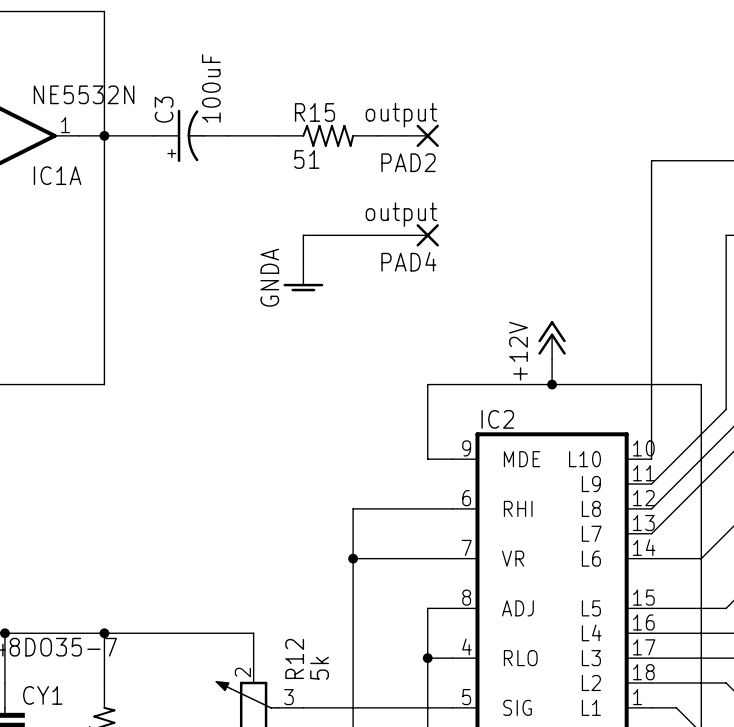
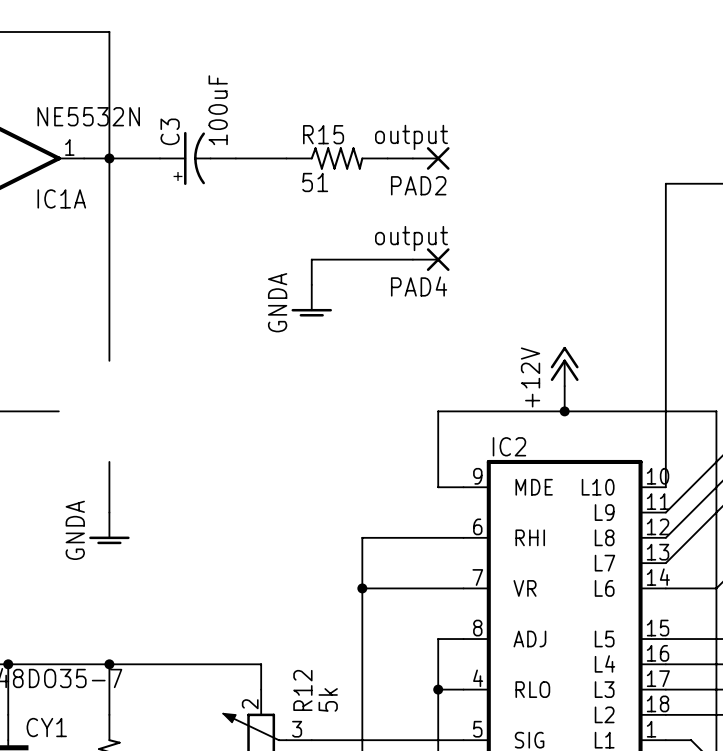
wire: (104, 334) (104, 384) (54, 384) -> none
wire: none -> (109, 461) (109, 512)
power symbol: none -> GNDA (109, 528)

